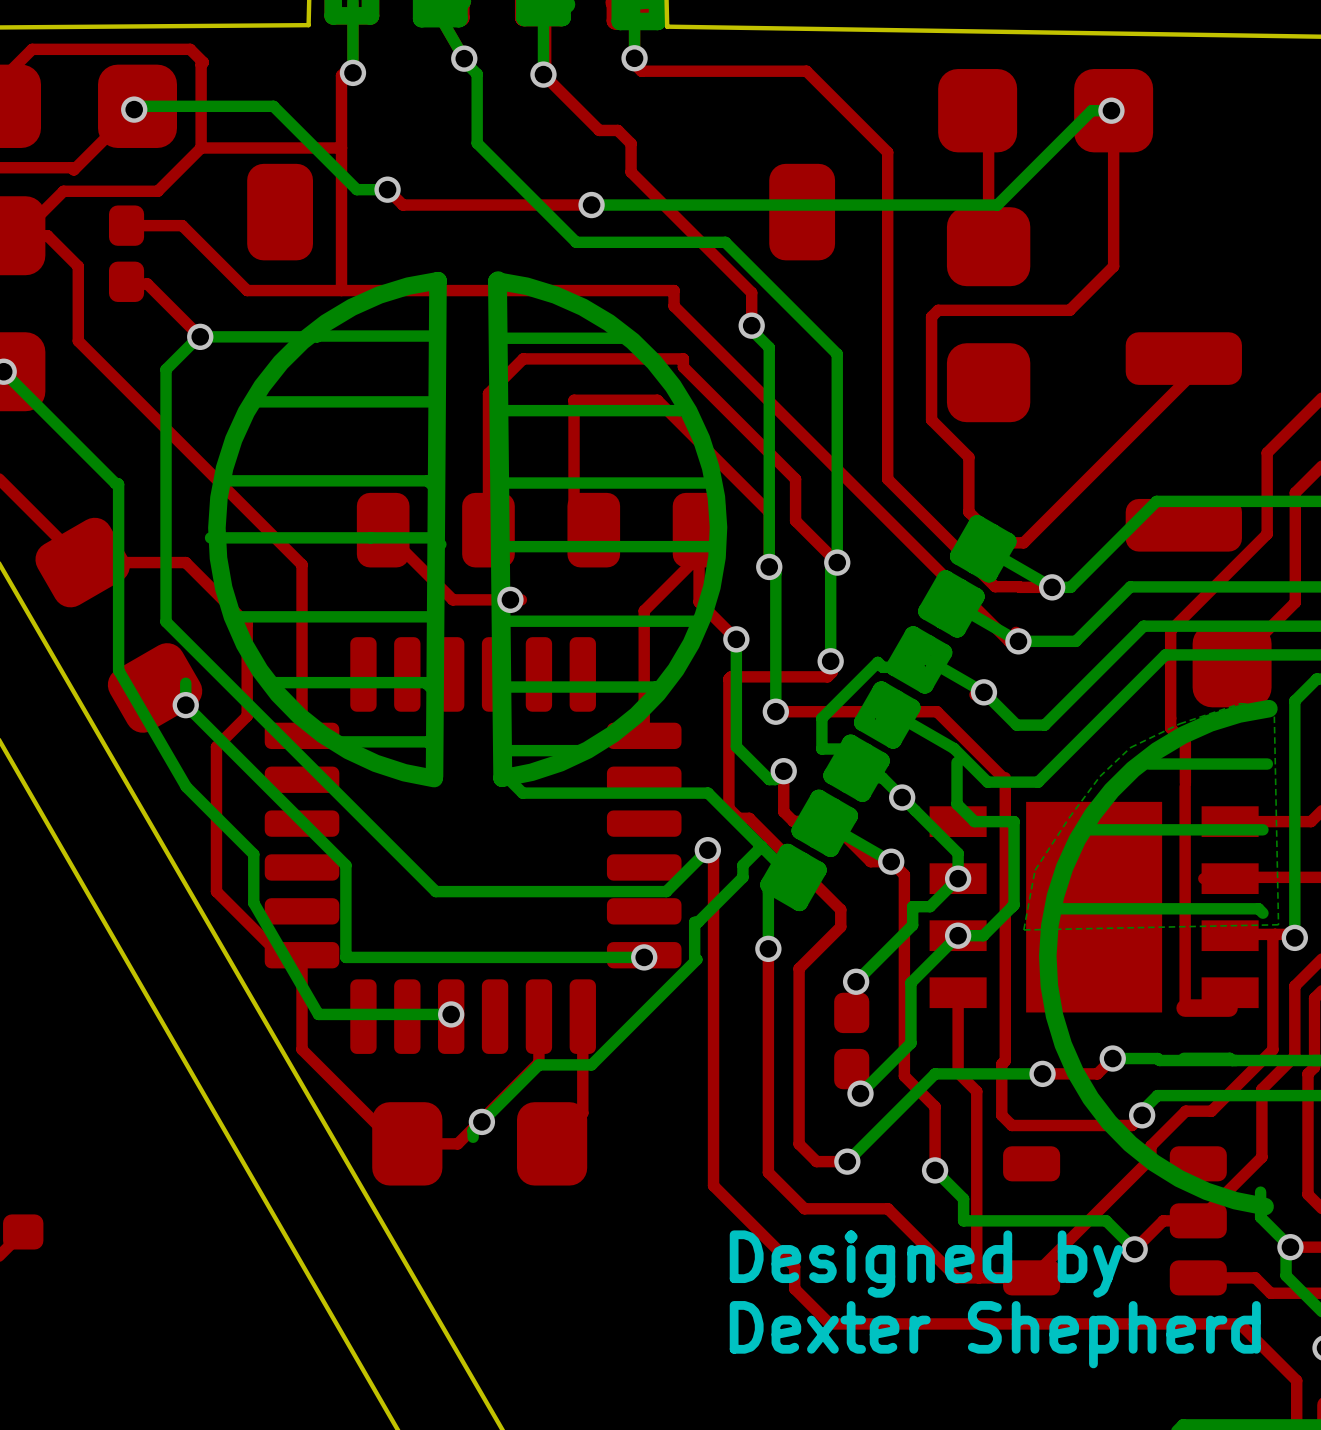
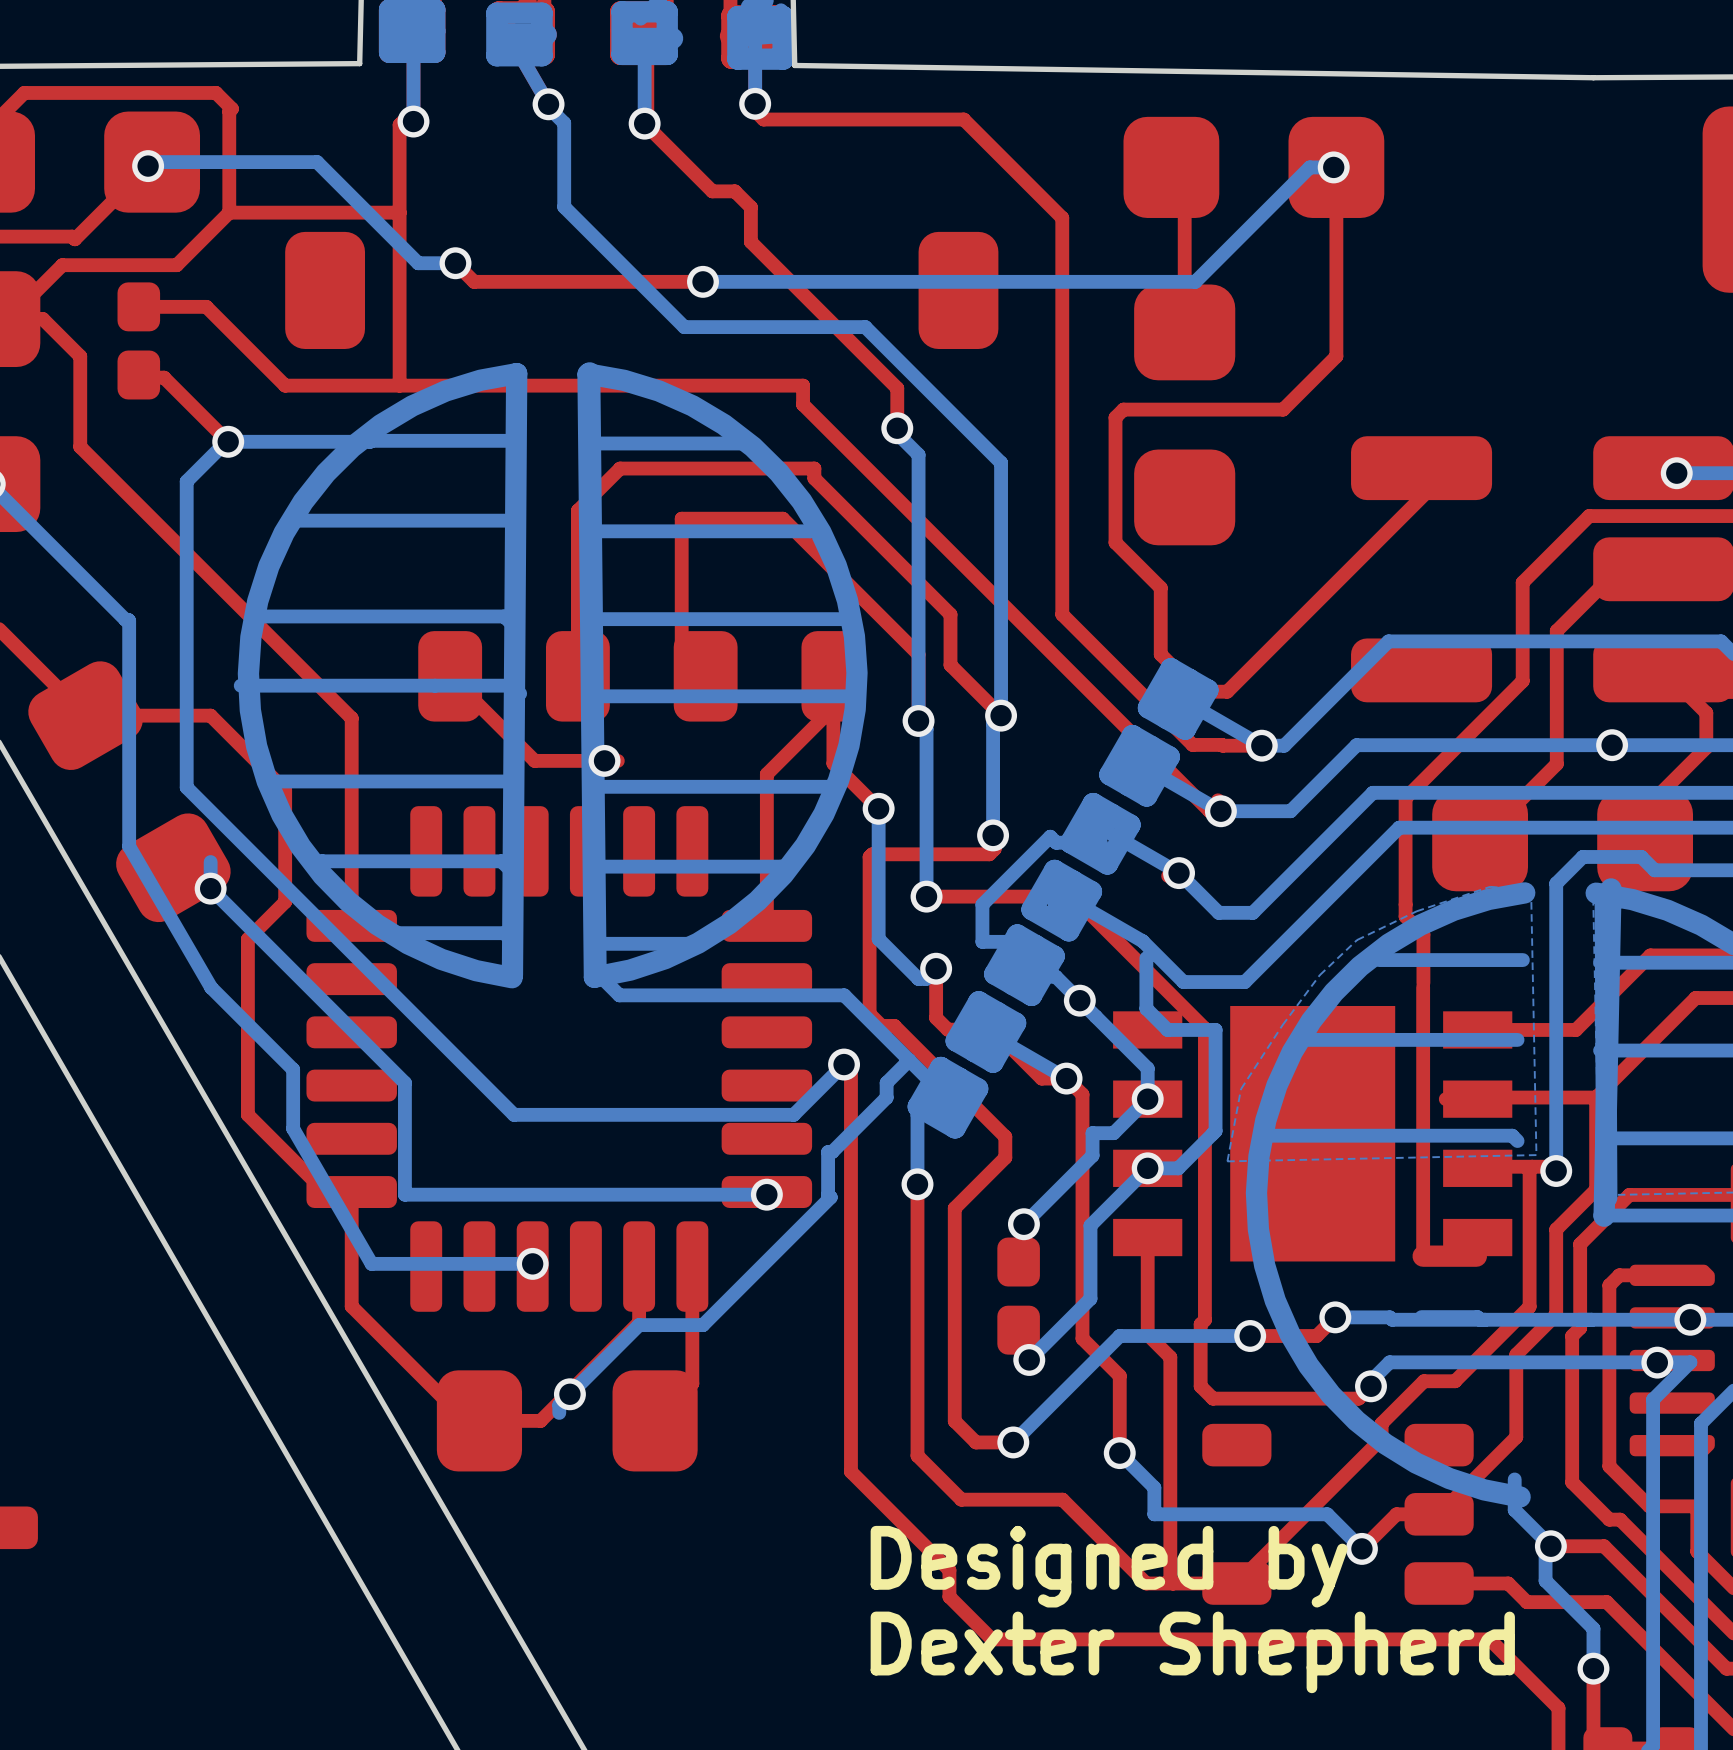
top track: (896, 711) (937, 711) (1003, 777) -> (1072, 896) (1204, 1028)
top track: (1005, 777) (1005, 820) -> none

